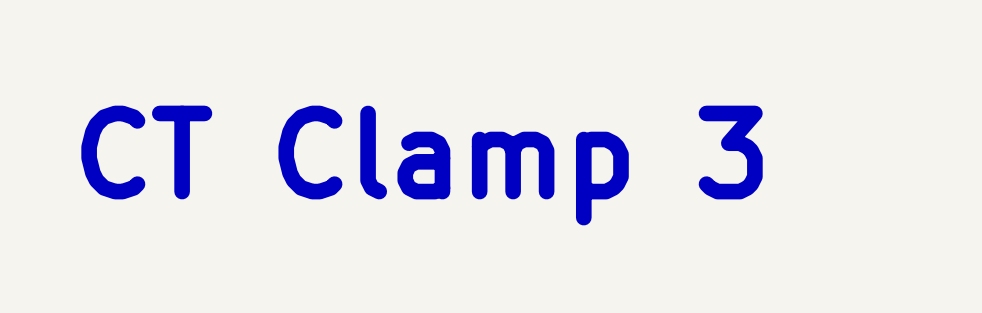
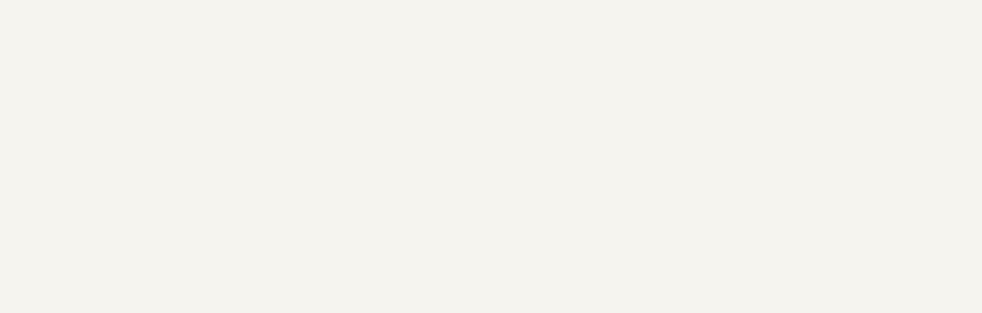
text: CT Clamp 3 (422, 165) -> none

